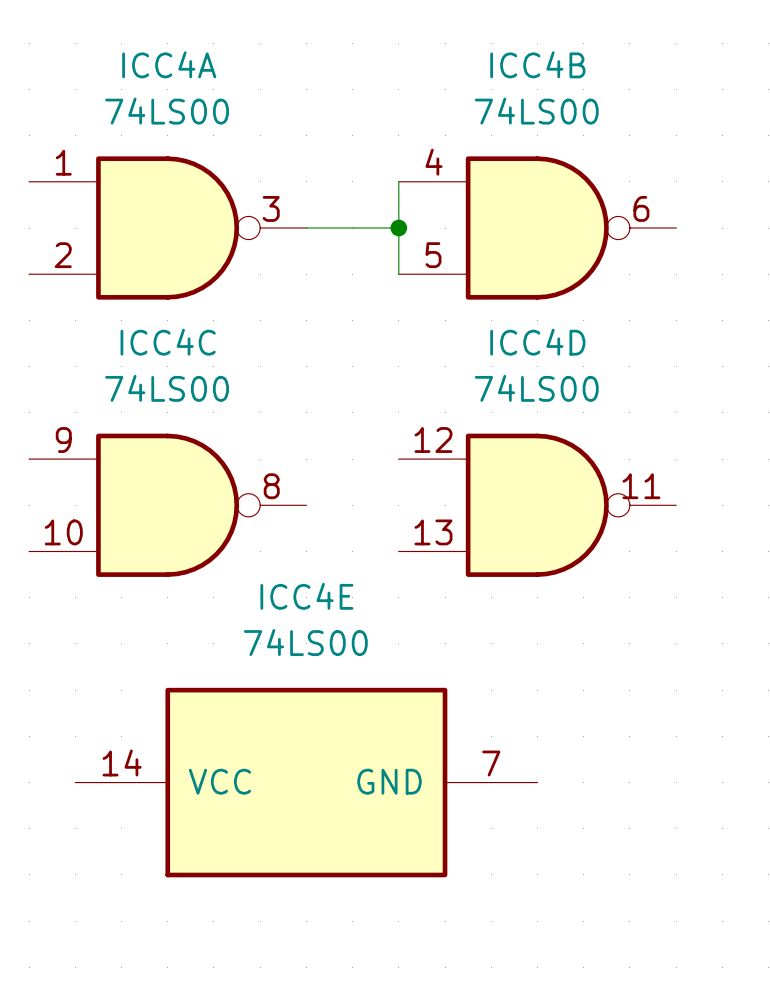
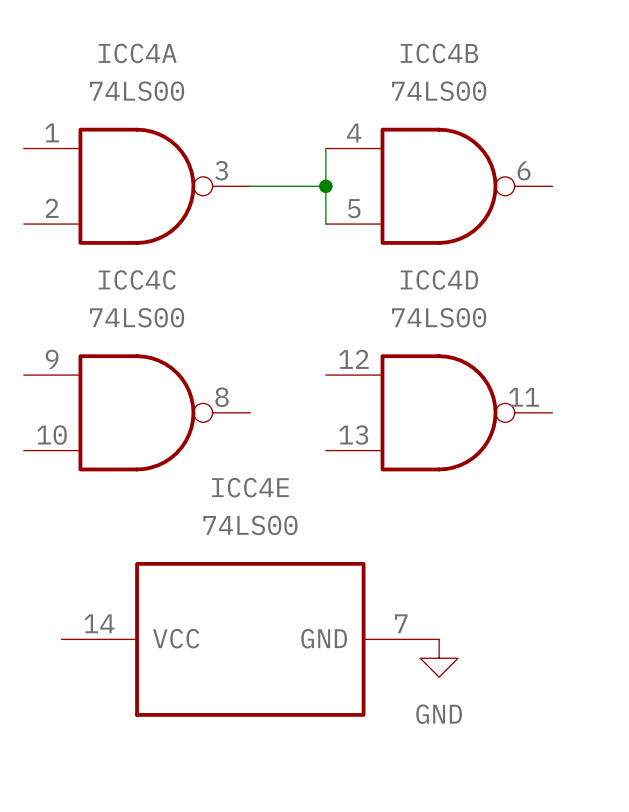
power symbol: none -> GND (439, 658)

